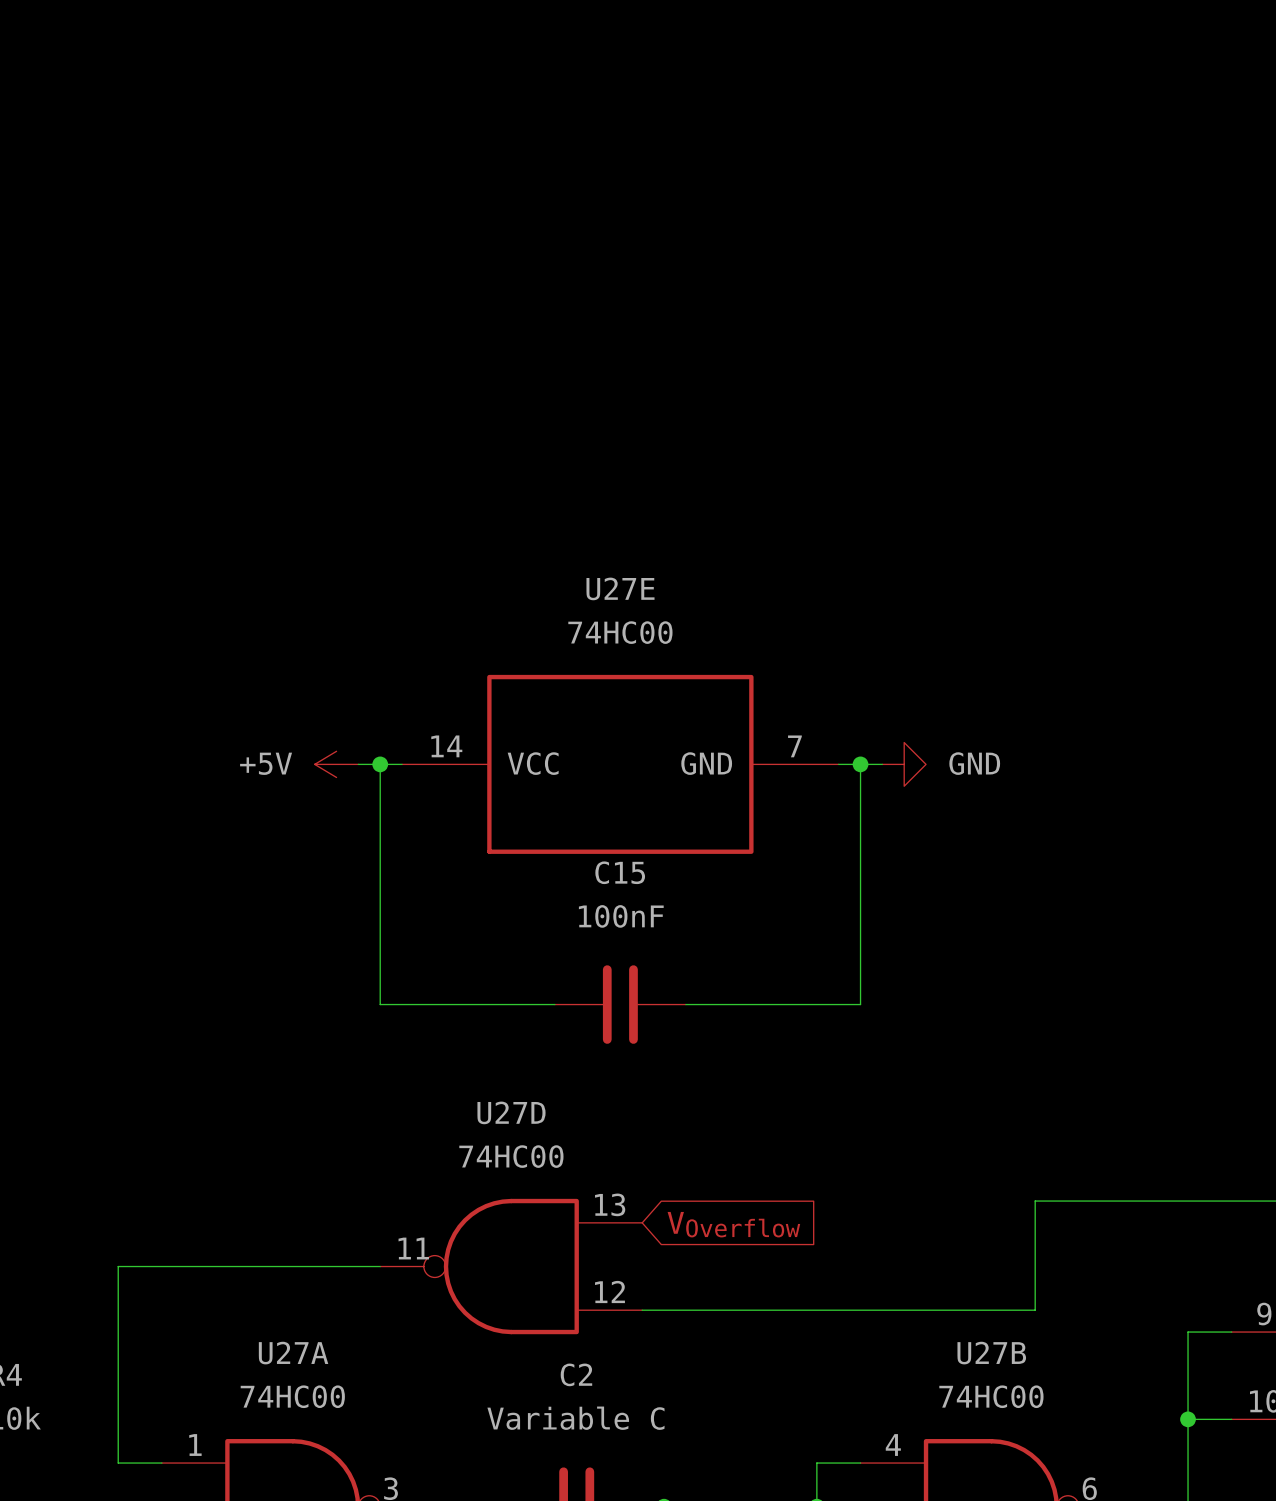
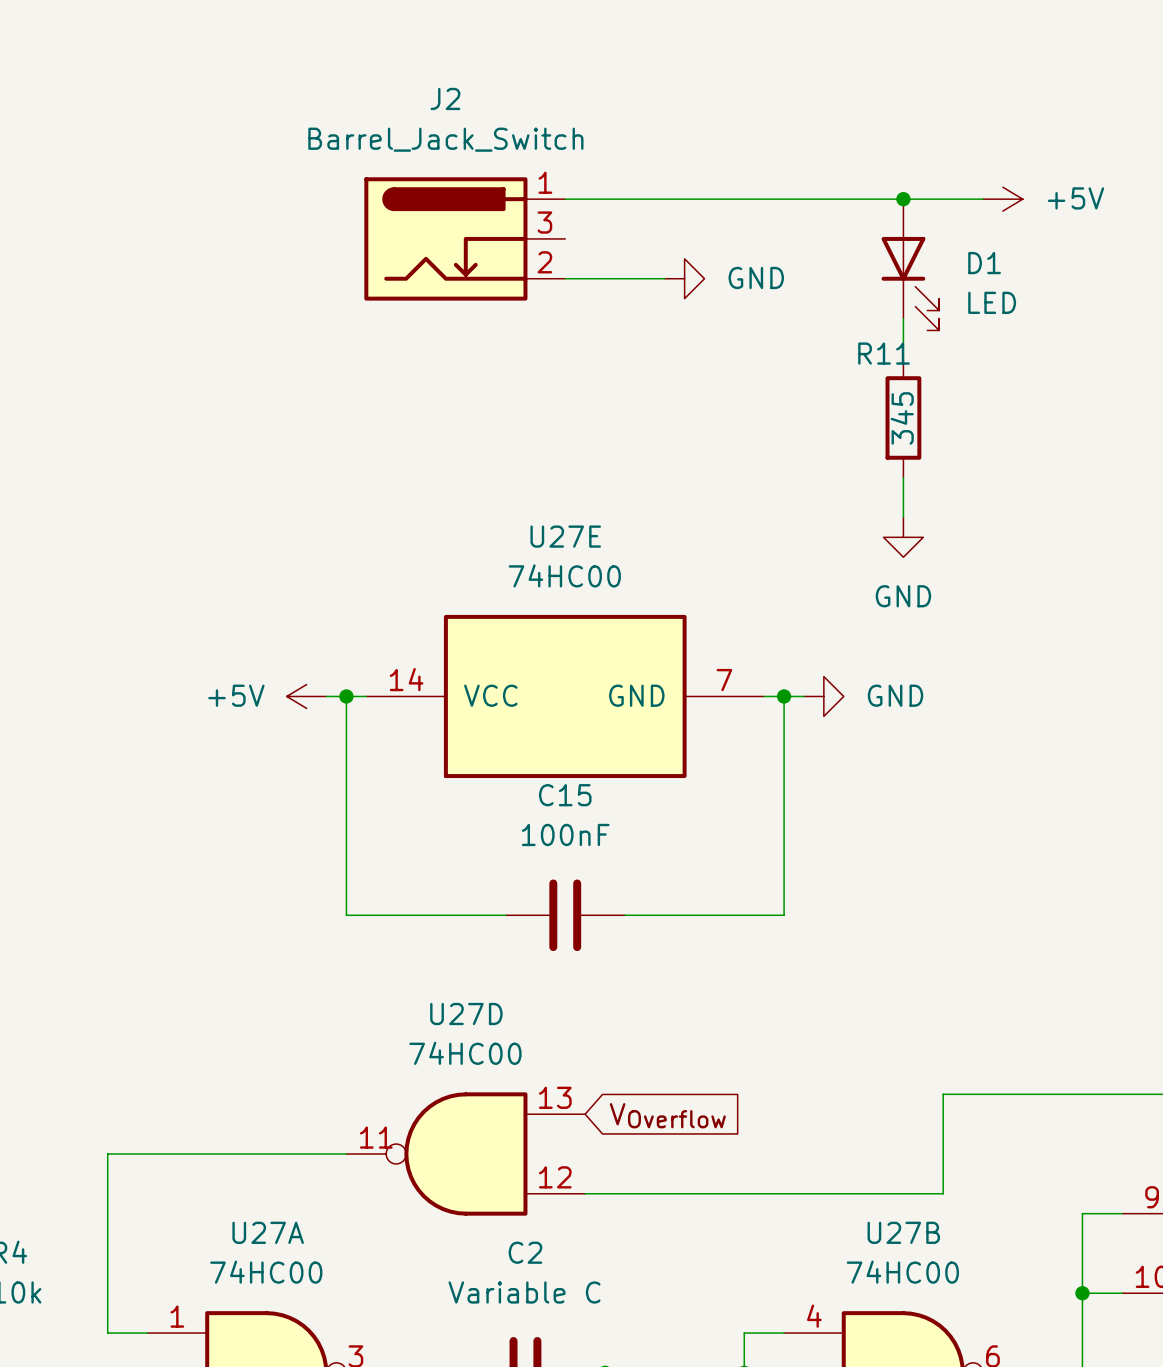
wire: none -> (565, 199) (982, 199)
junction: none -> (903, 199)
power symbol: none -> +5V (1002, 199)
J2: none -> Barrel_Jack_Switch (464, 238)
D1: none -> LED (910, 264)
wire: none -> (565, 278) (664, 278)
power symbol: none -> GND (684, 278)
wire: none -> (903, 318) (903, 358)
R11: none -> 345 (903, 417)
wire: none -> (903, 477) (903, 517)
power symbol: none -> GND (903, 537)

